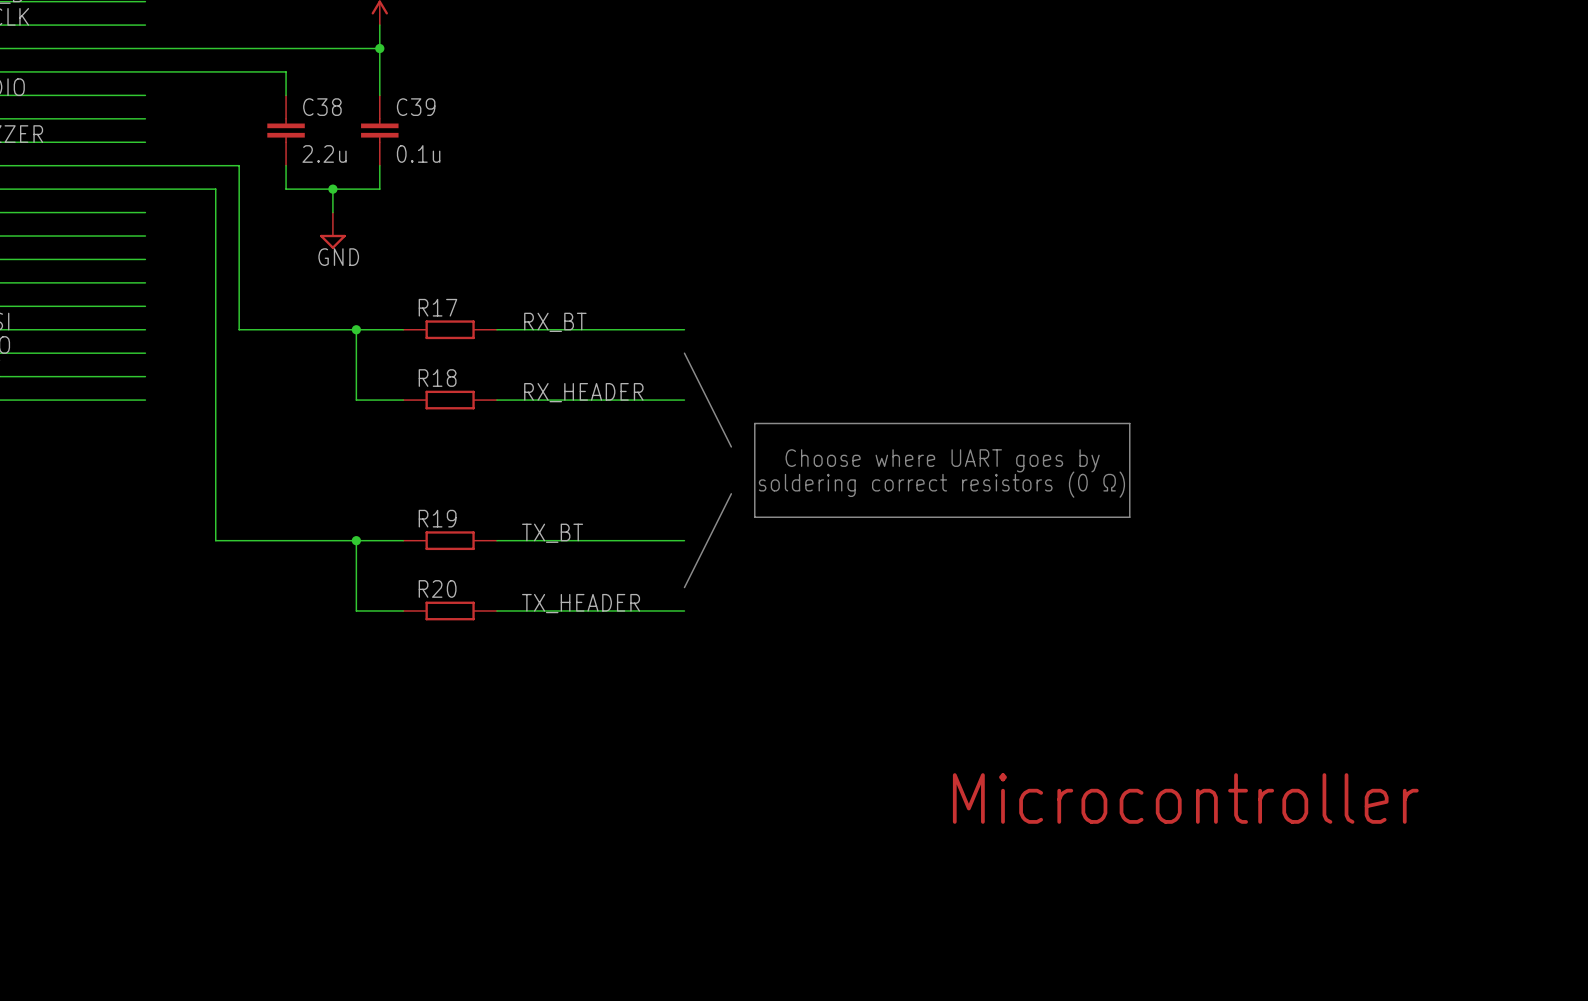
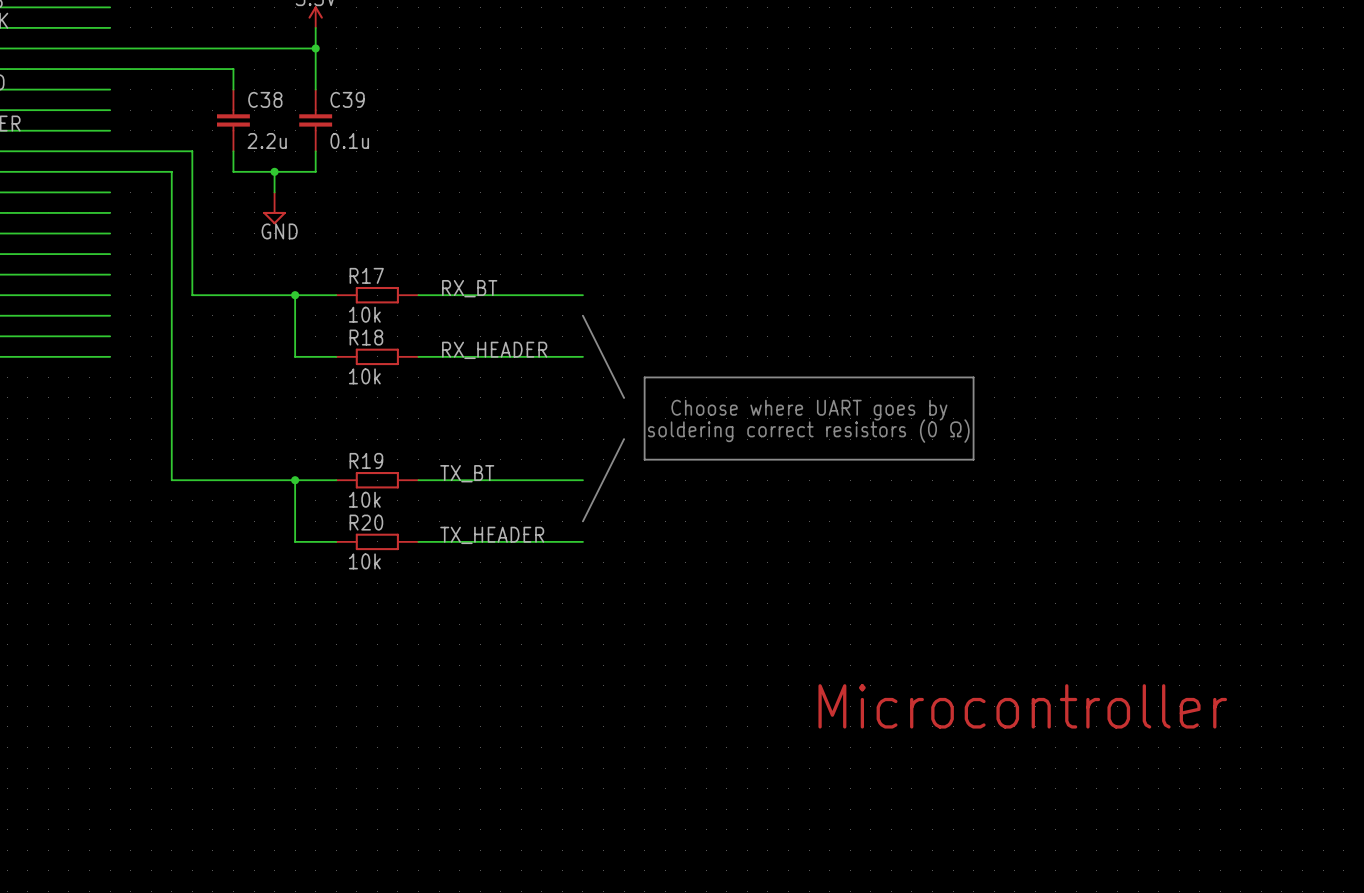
R17 value: none -> 10k (364, 314)
R18 value: none -> 10k (364, 376)
R19 value: none -> 10k (364, 499)
R20 value: none -> 10k (364, 561)

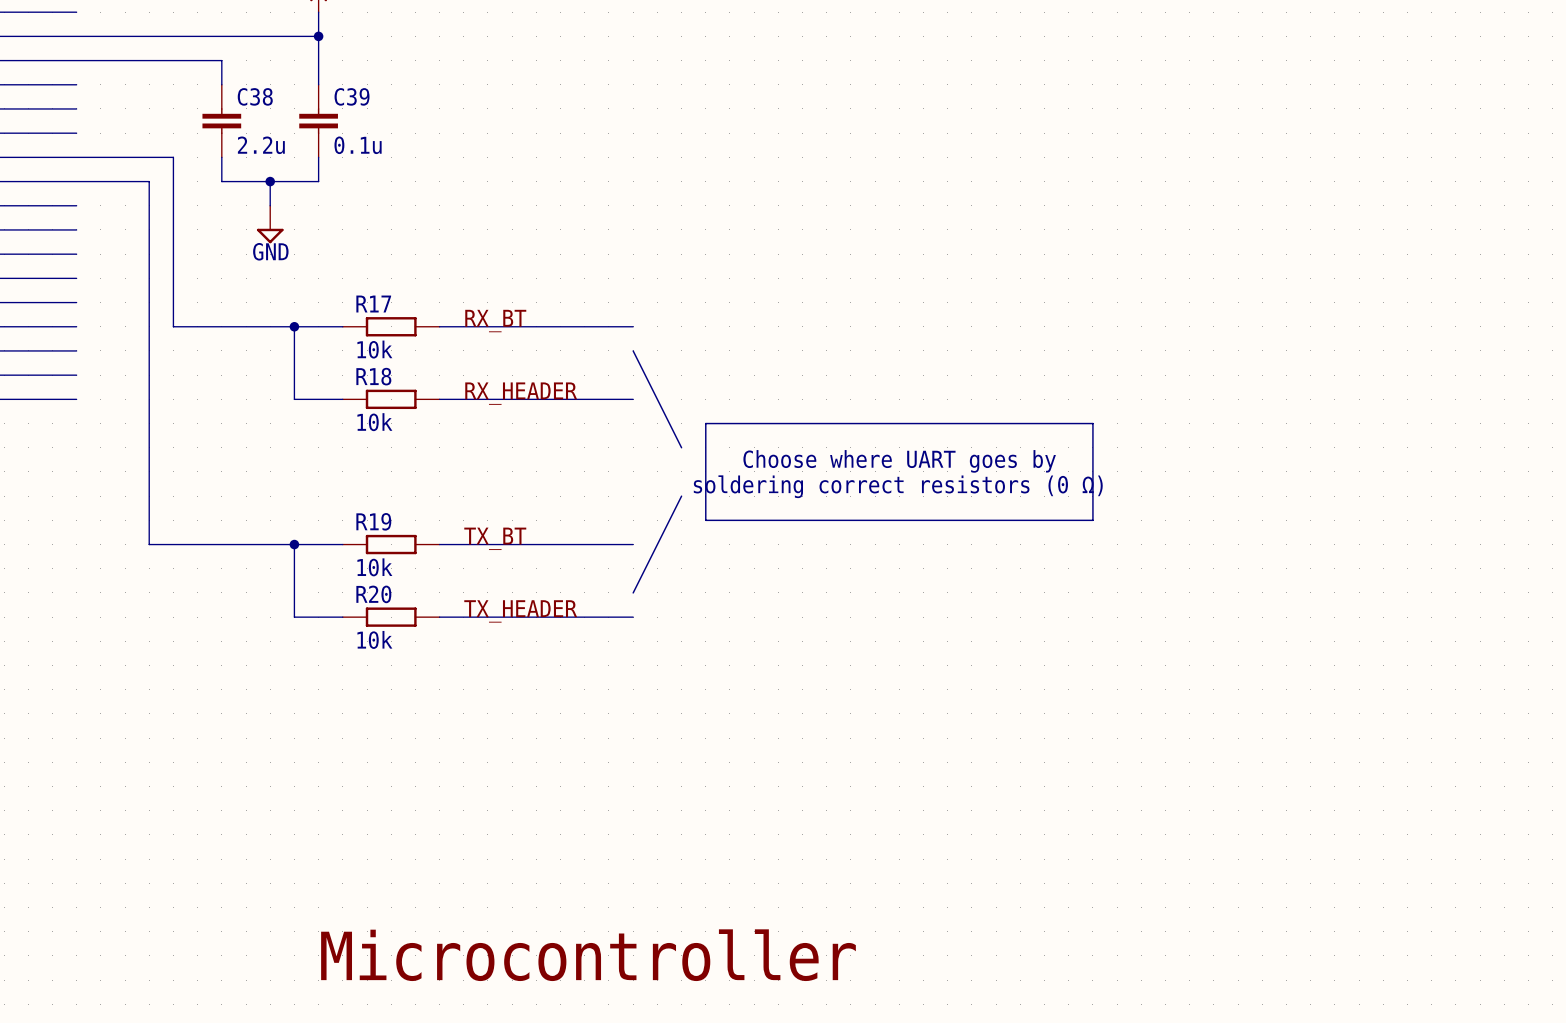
text: Microcontroller (1022, 706) -> none
text: none -> Microcontroller (588, 955)

